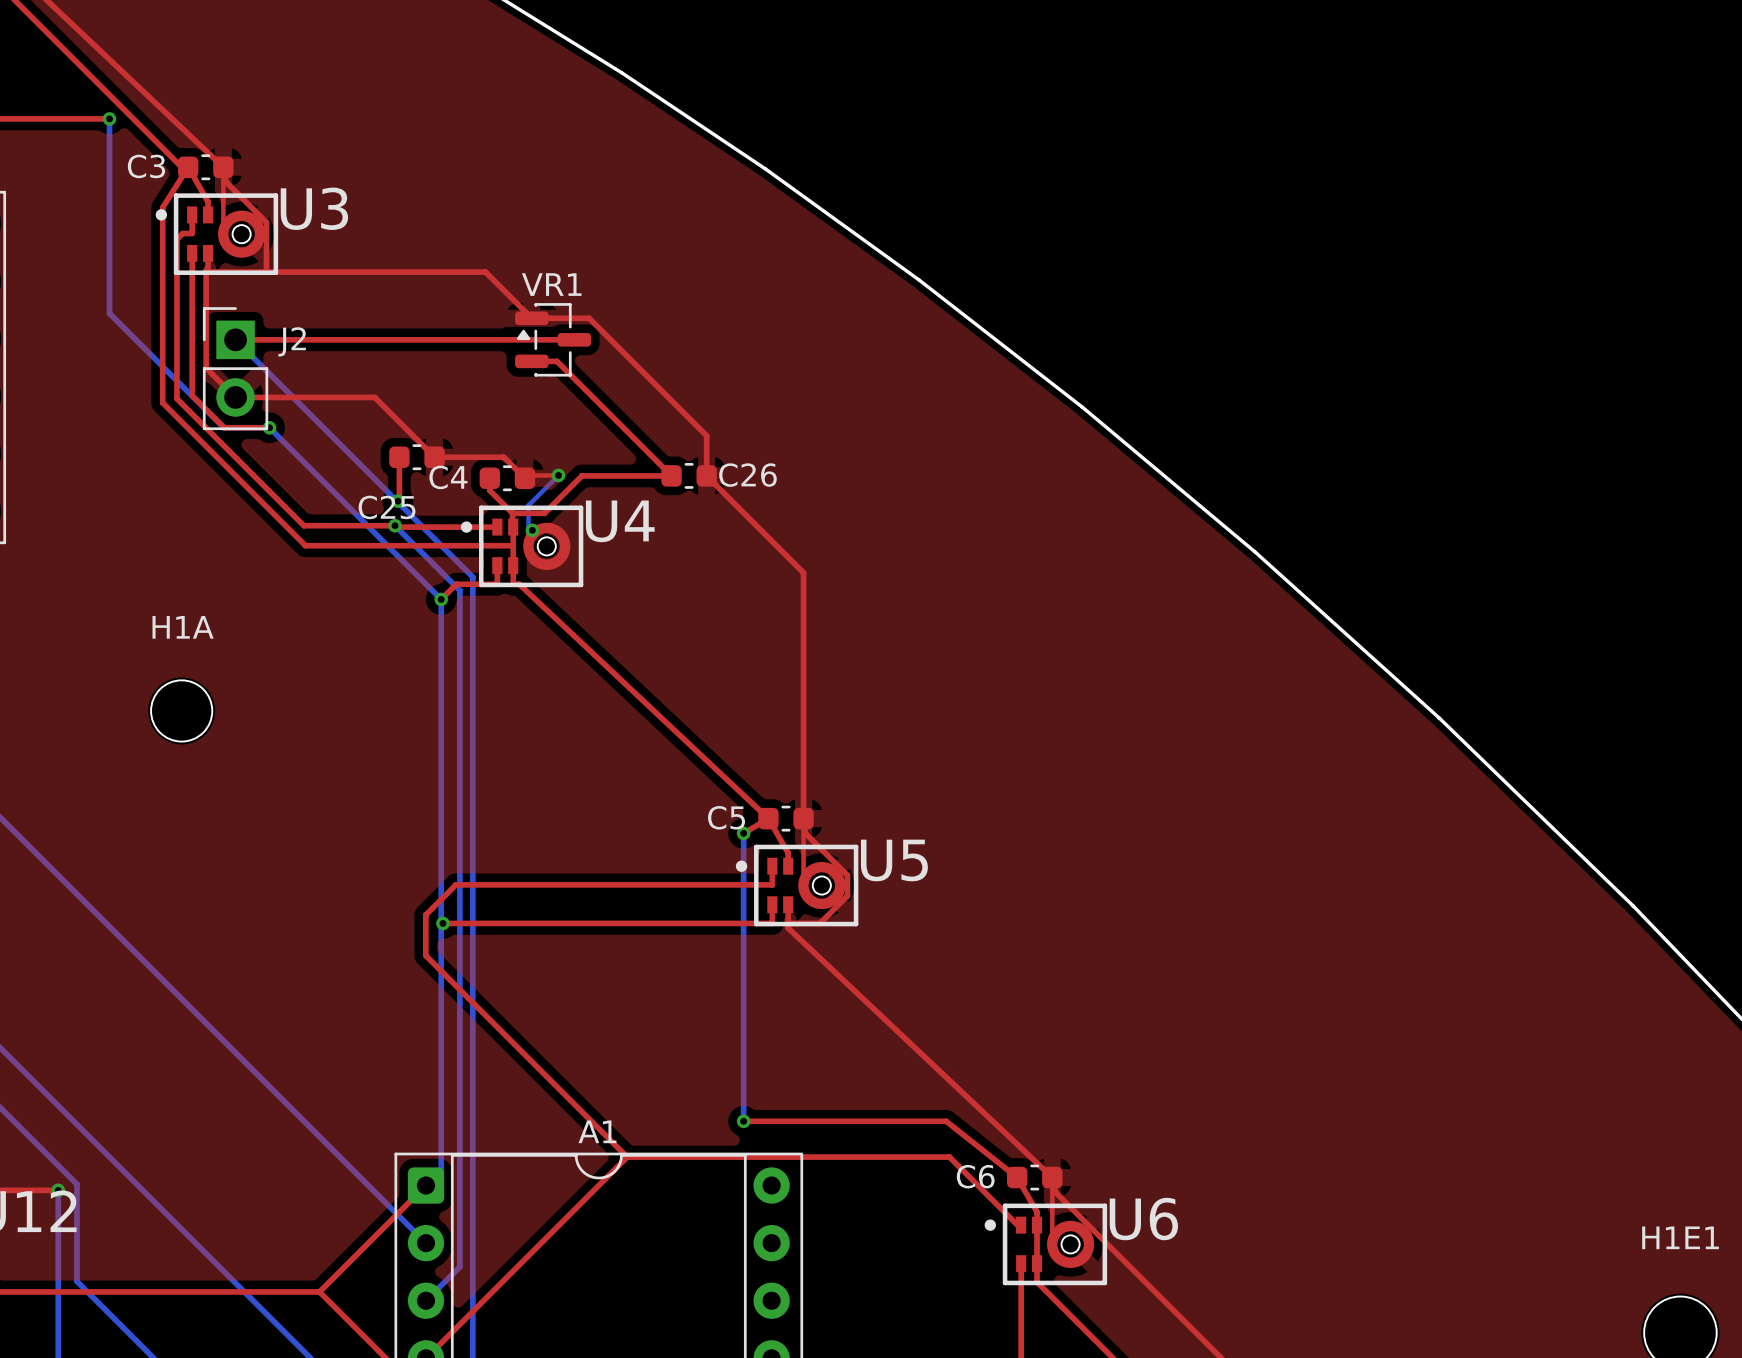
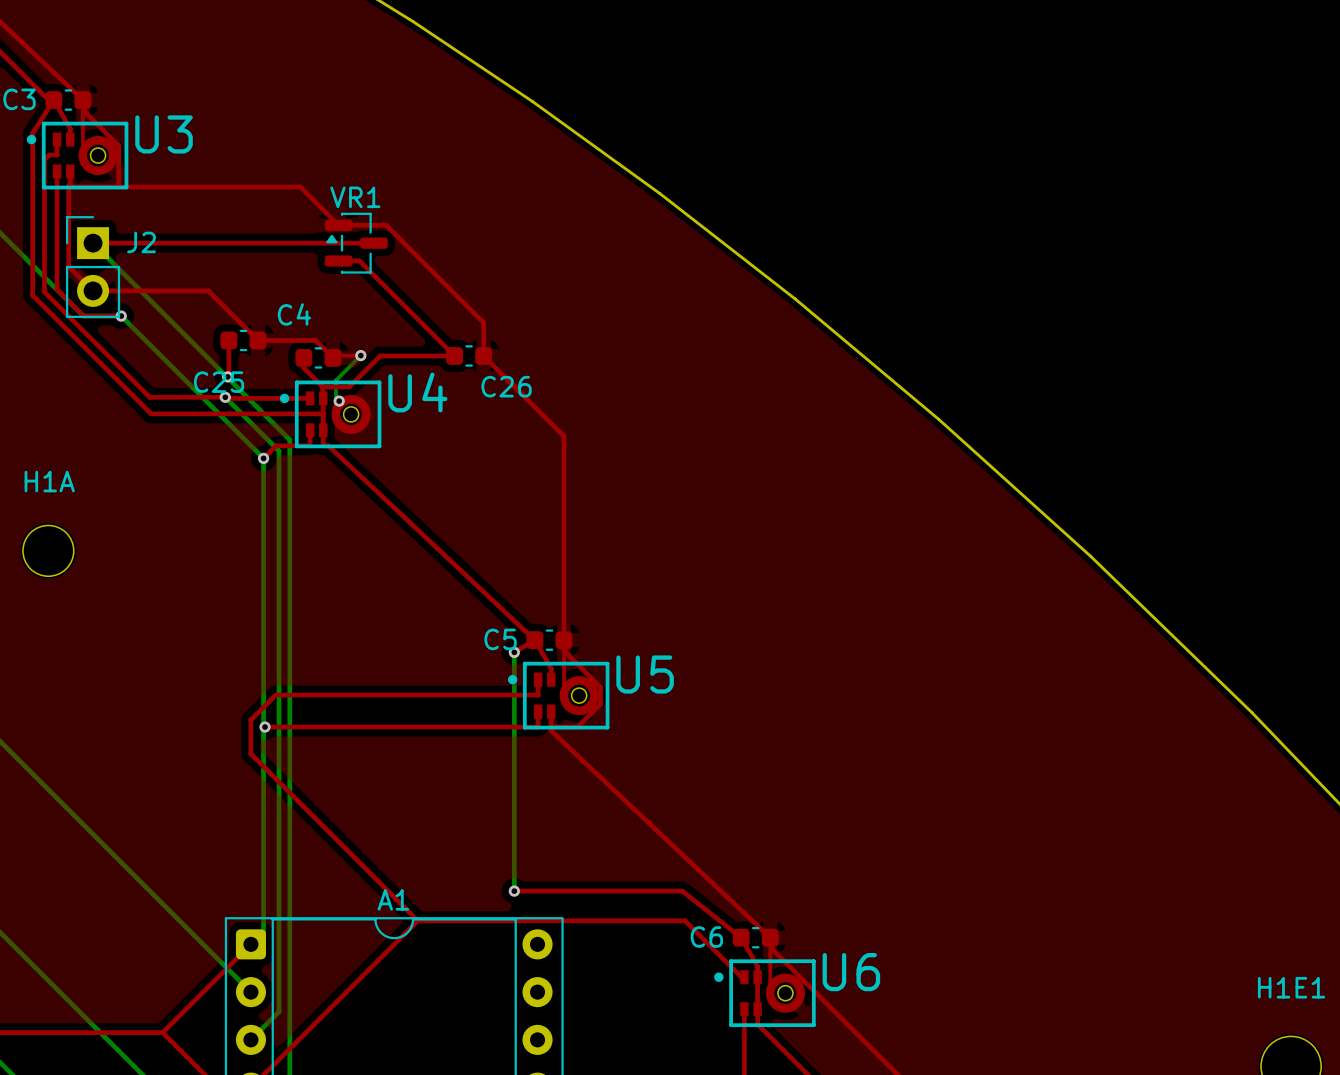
C26 name position: C26 (747, 475) -> C26 (506, 386)
C4 name position: C4 (448, 477) -> C4 (294, 314)

